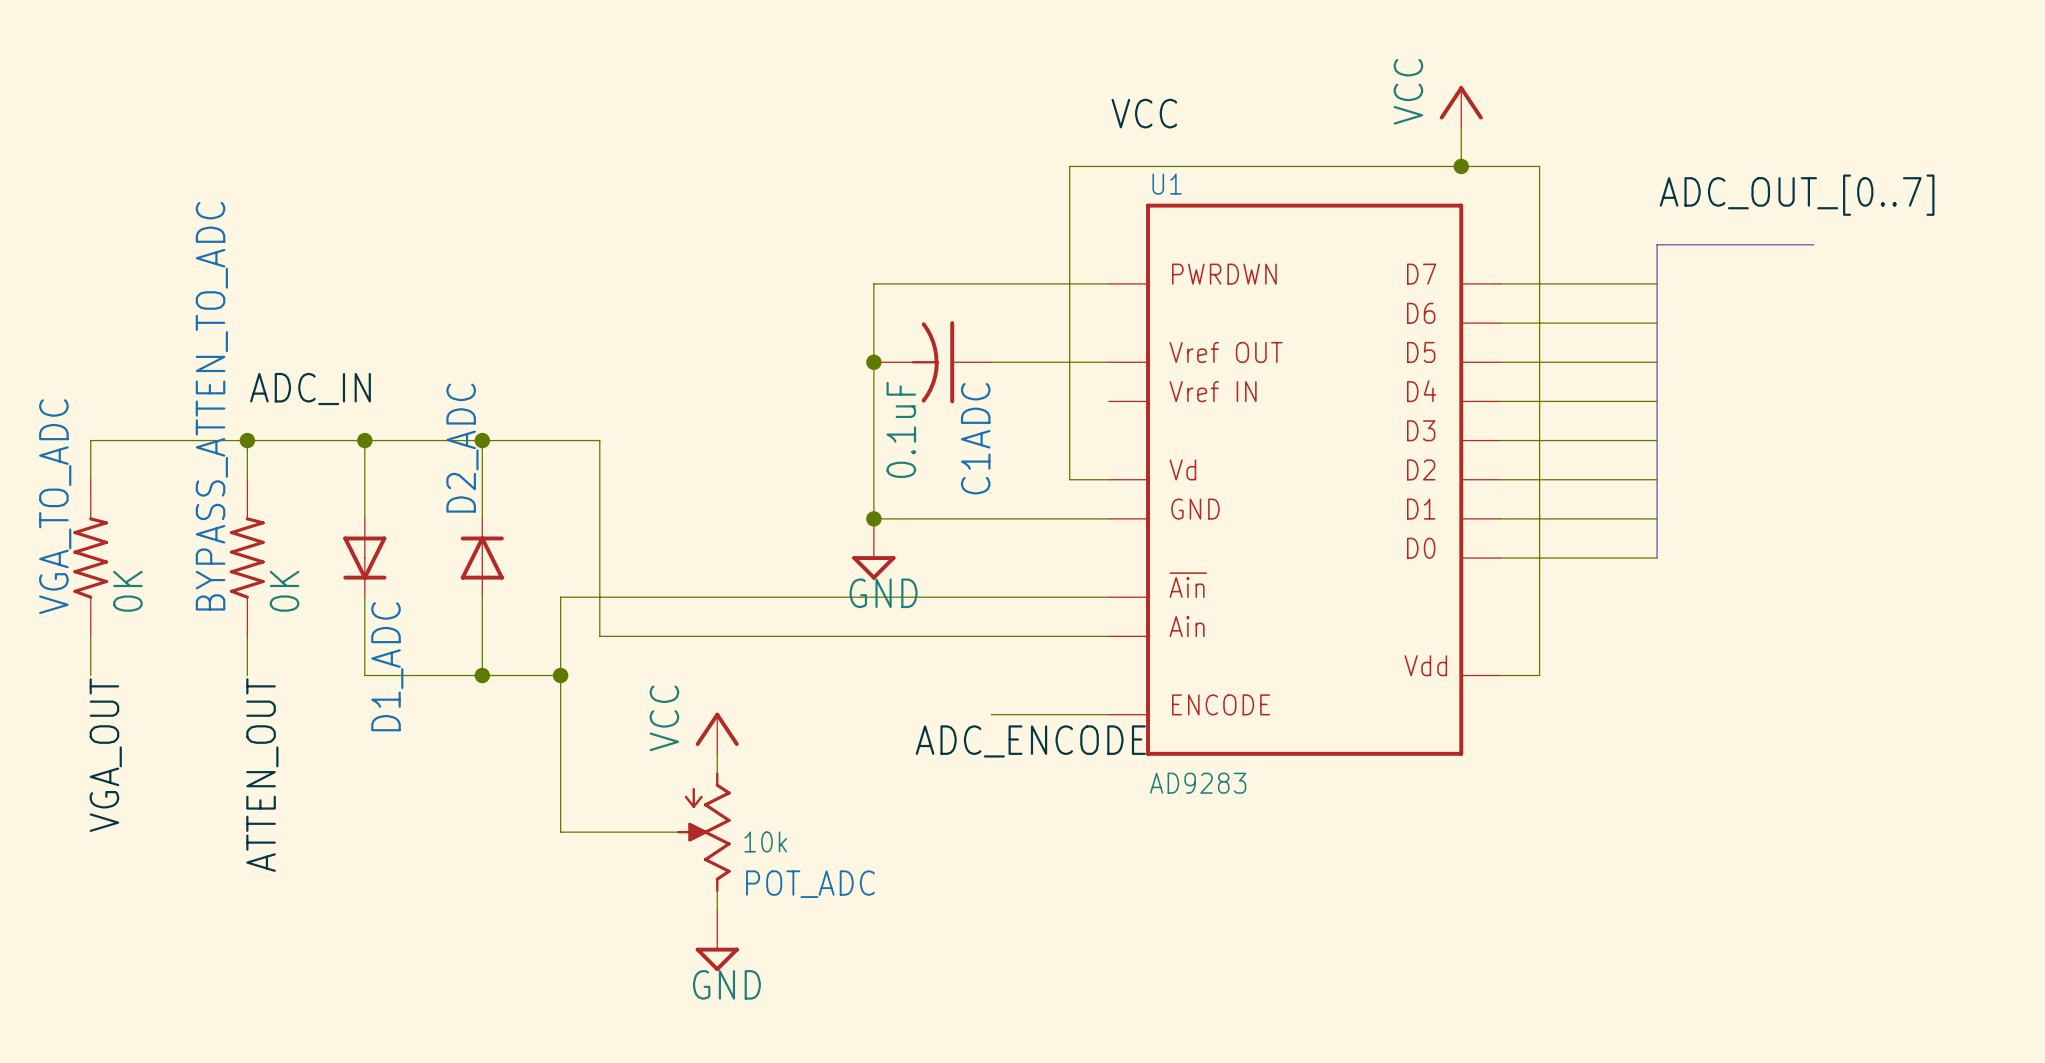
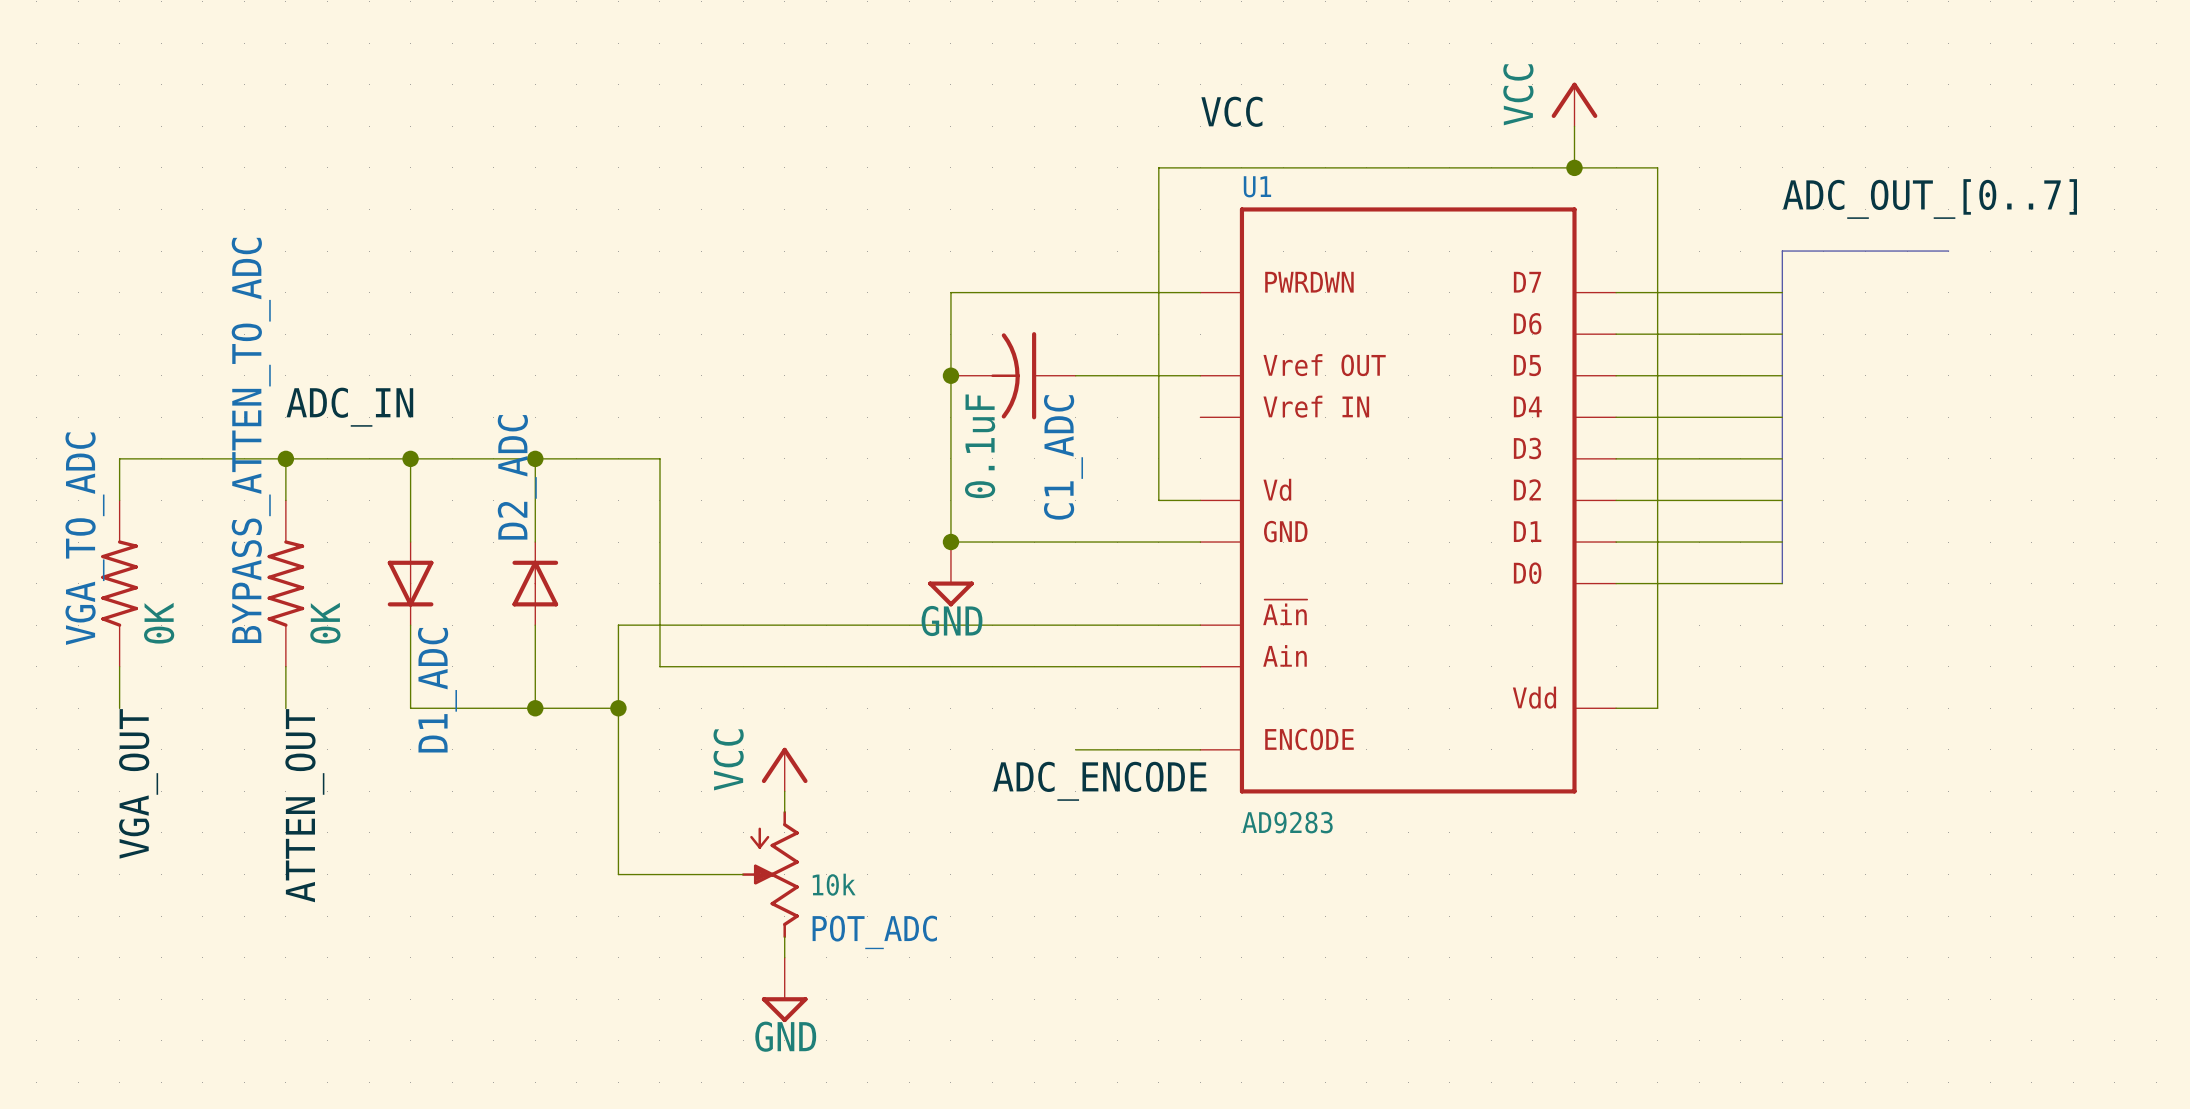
C1ADC name: C1ADC (975, 438) -> C1_ADC (1063, 457)

